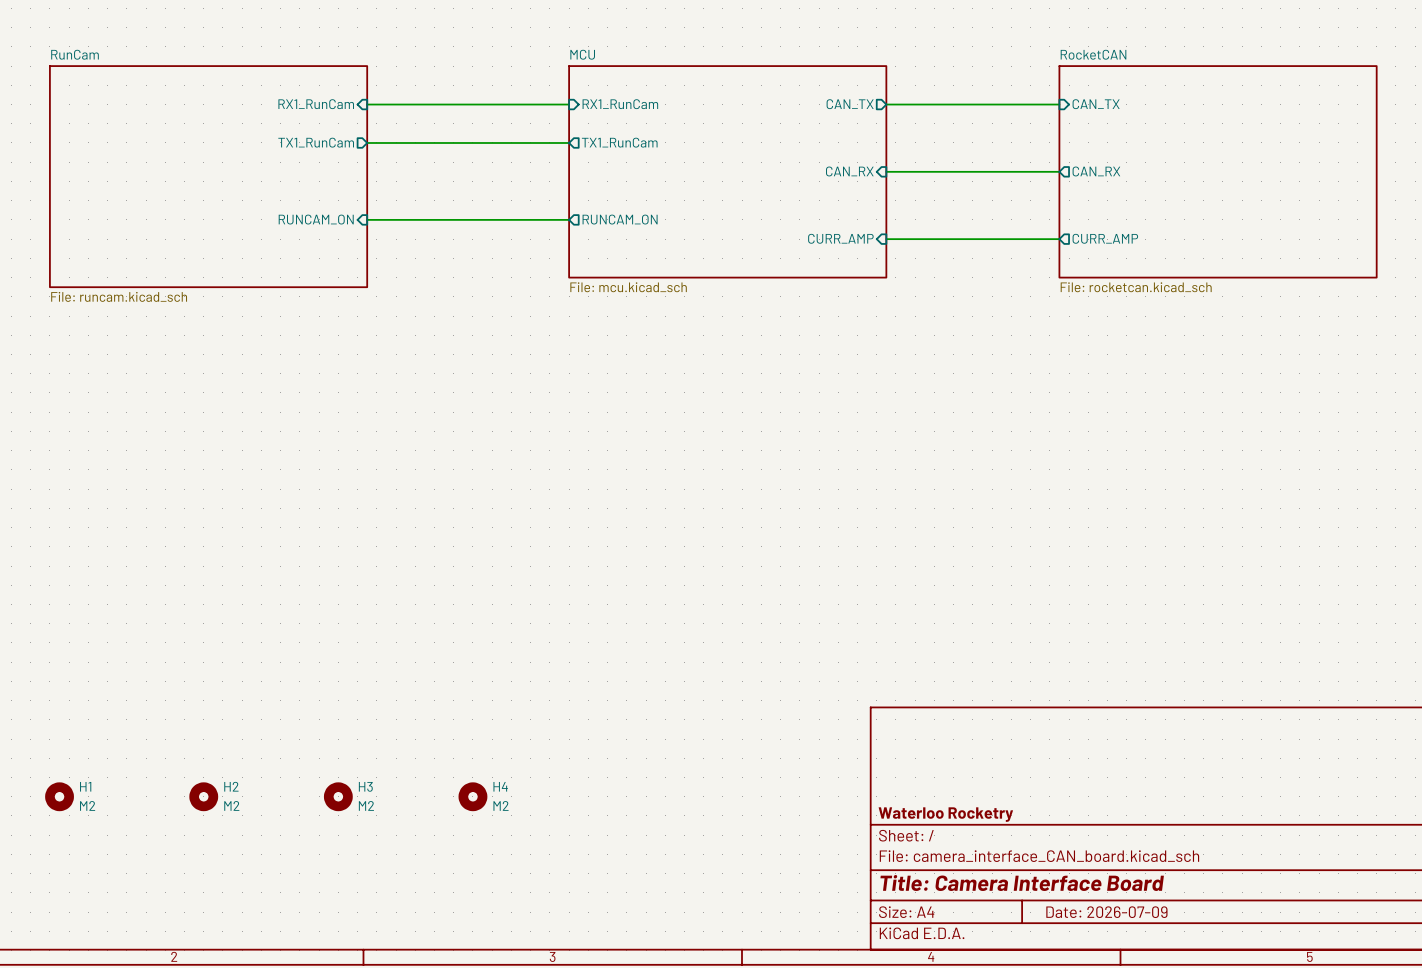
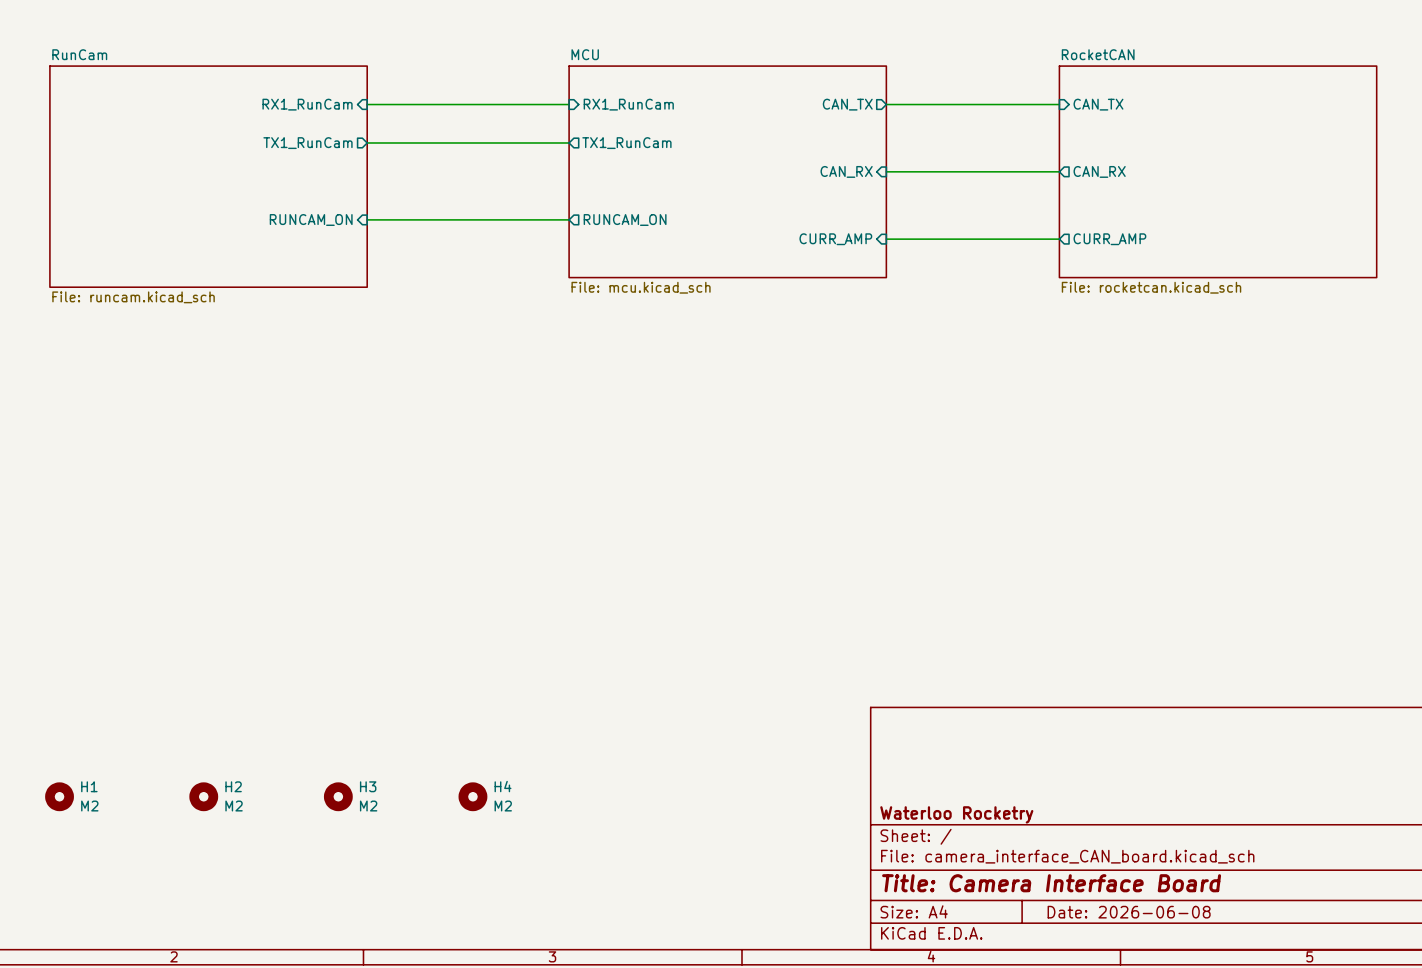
title block: Date: 2026-07-09 (1106, 912) -> Date: 2026-06-08 (1129, 912)

